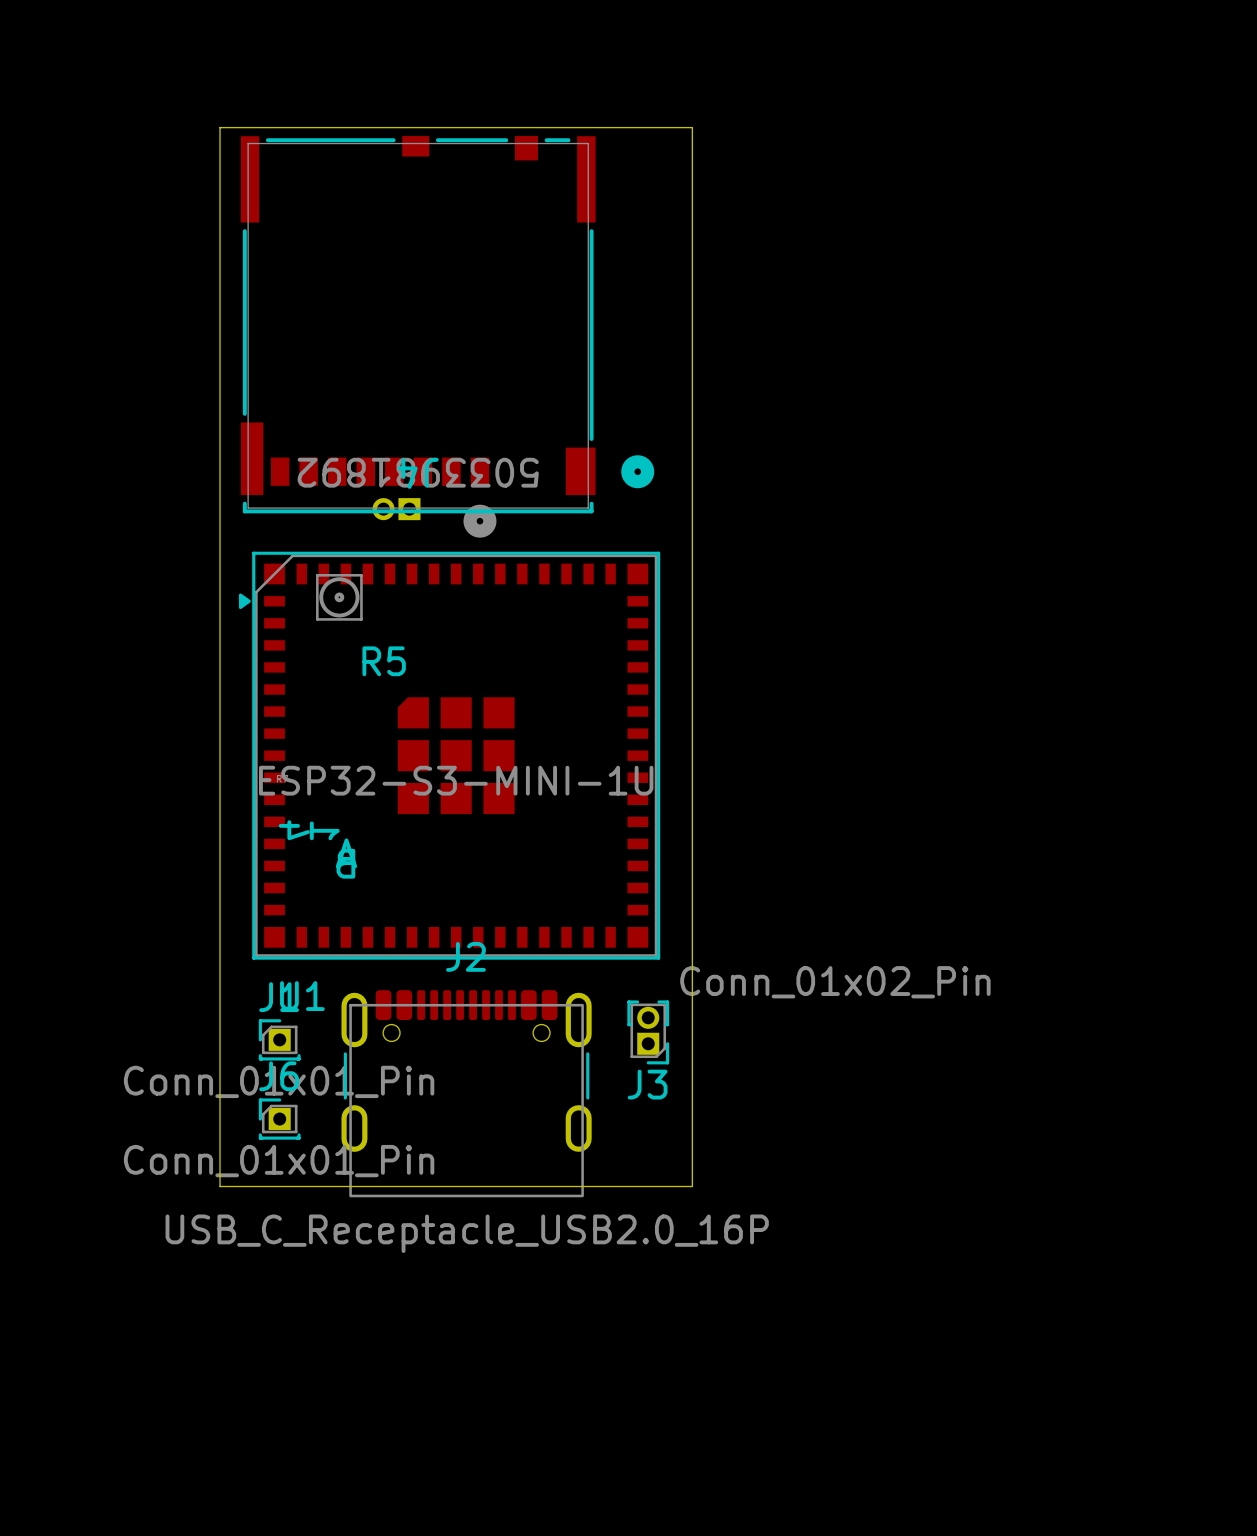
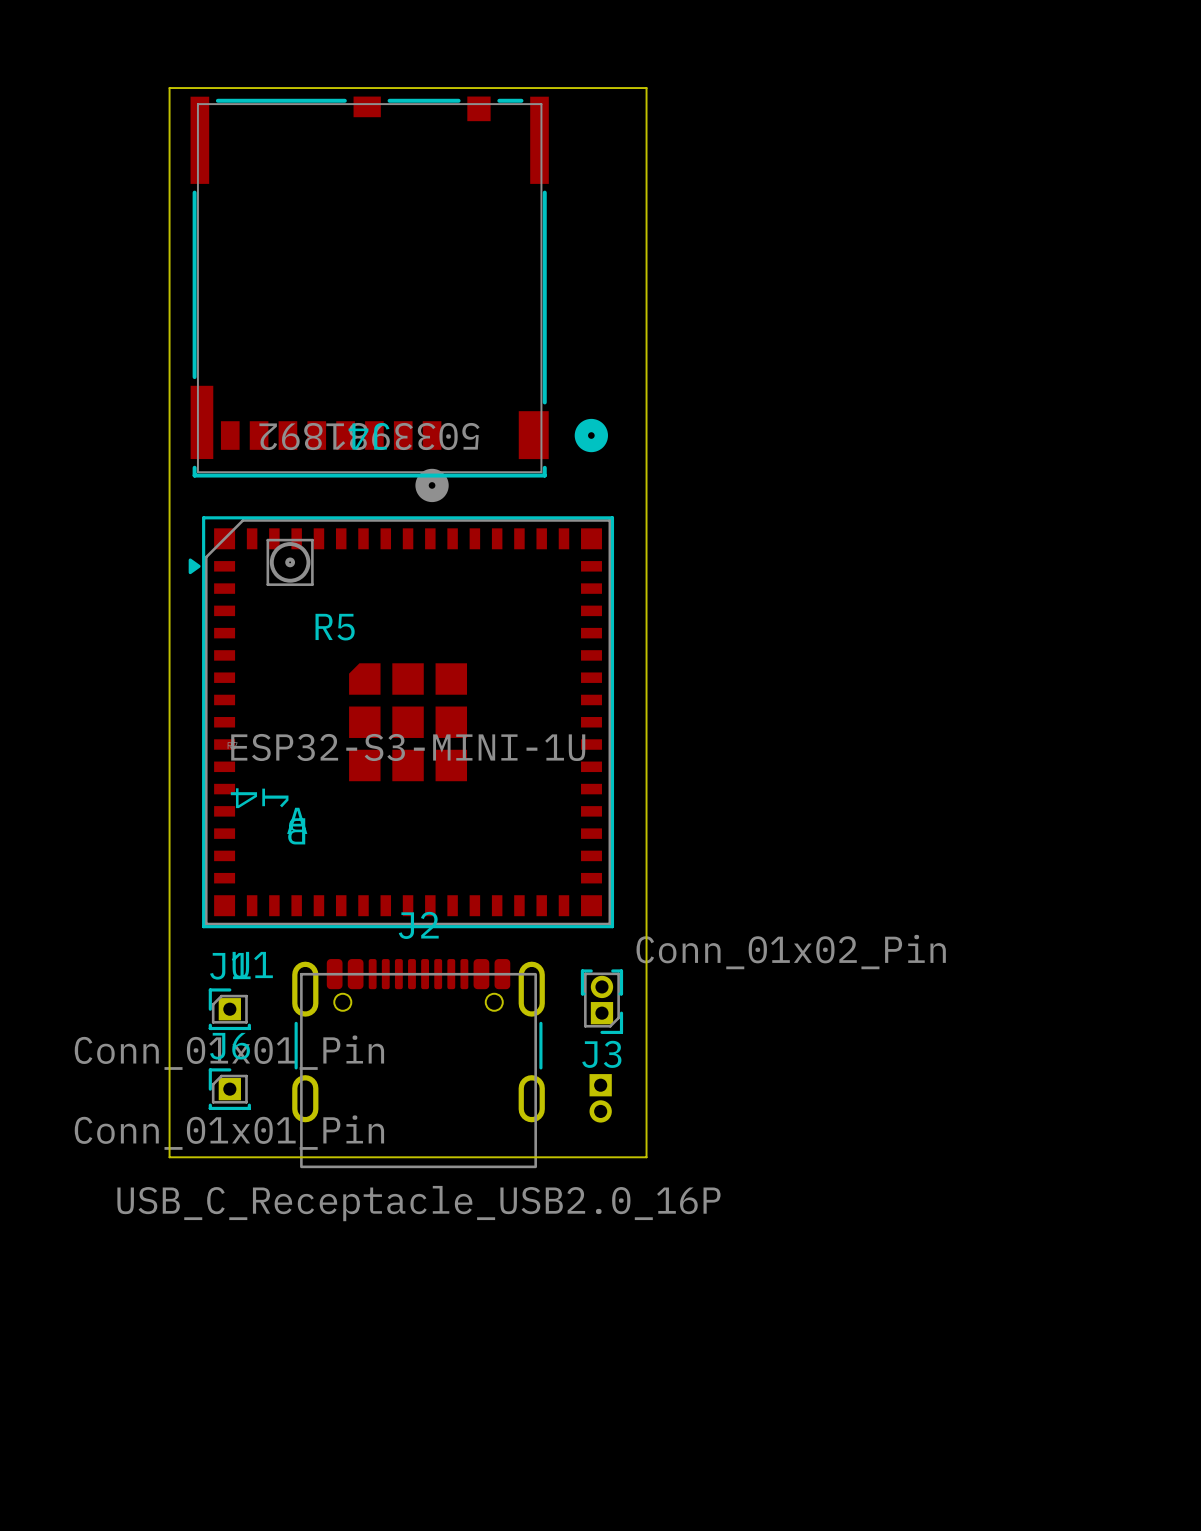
part: (396, 509) -> none
part: none -> (600, 1098)

